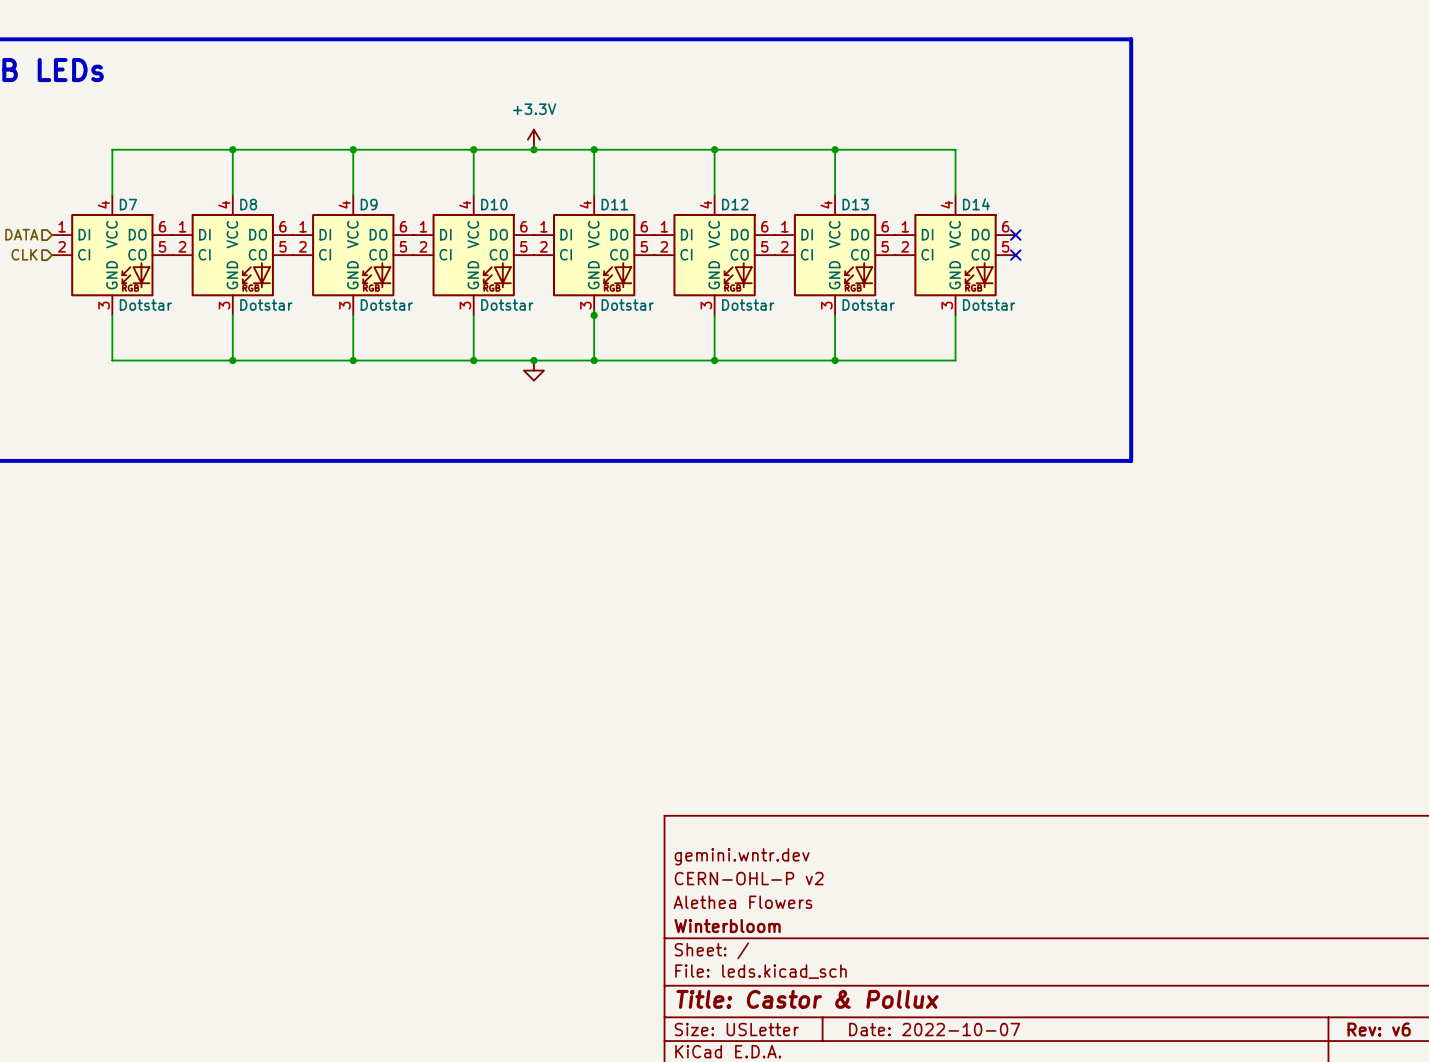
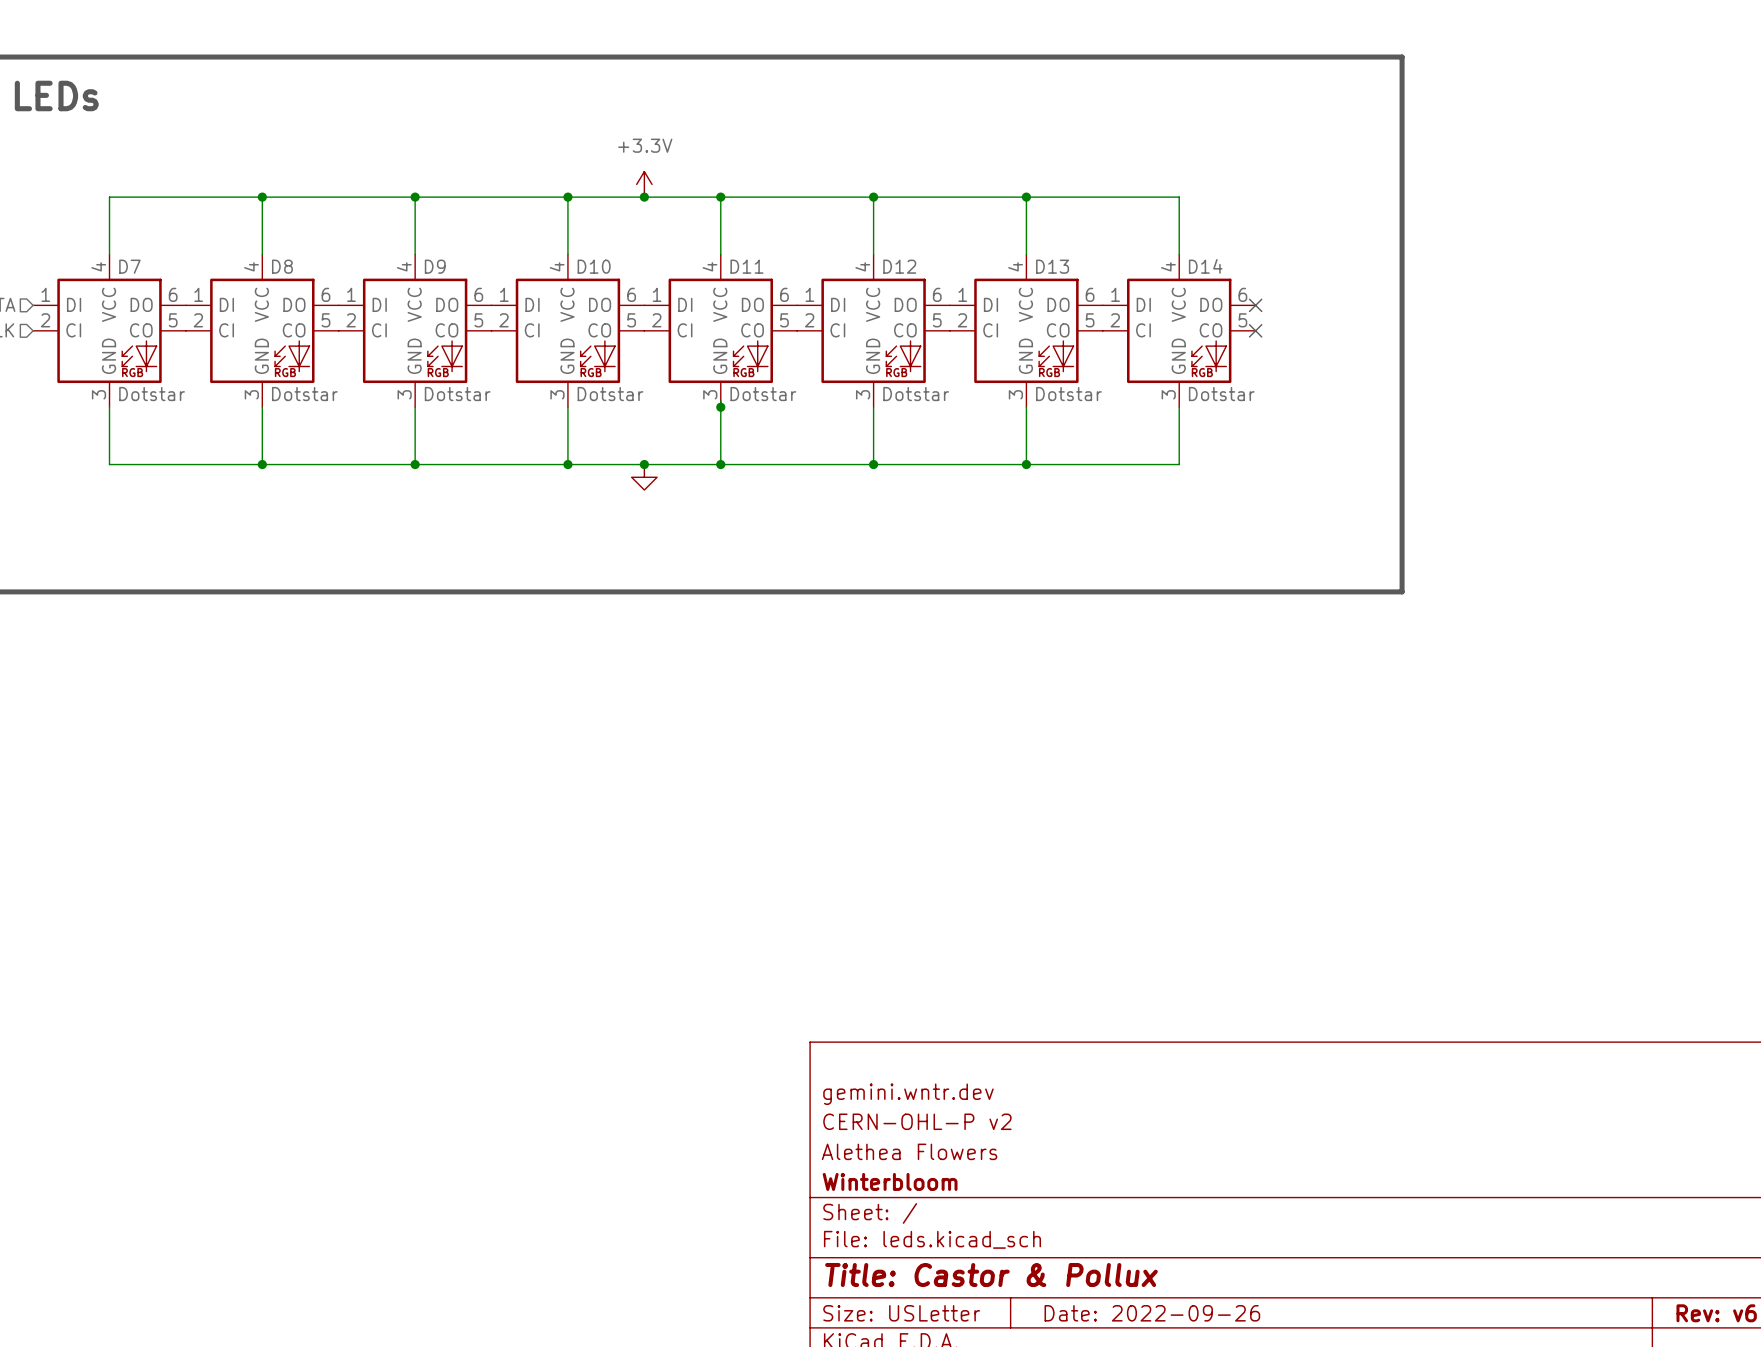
title block: Date: 2022-10-07 (934, 1029) -> Date: 2022-09-26 (1152, 1313)

